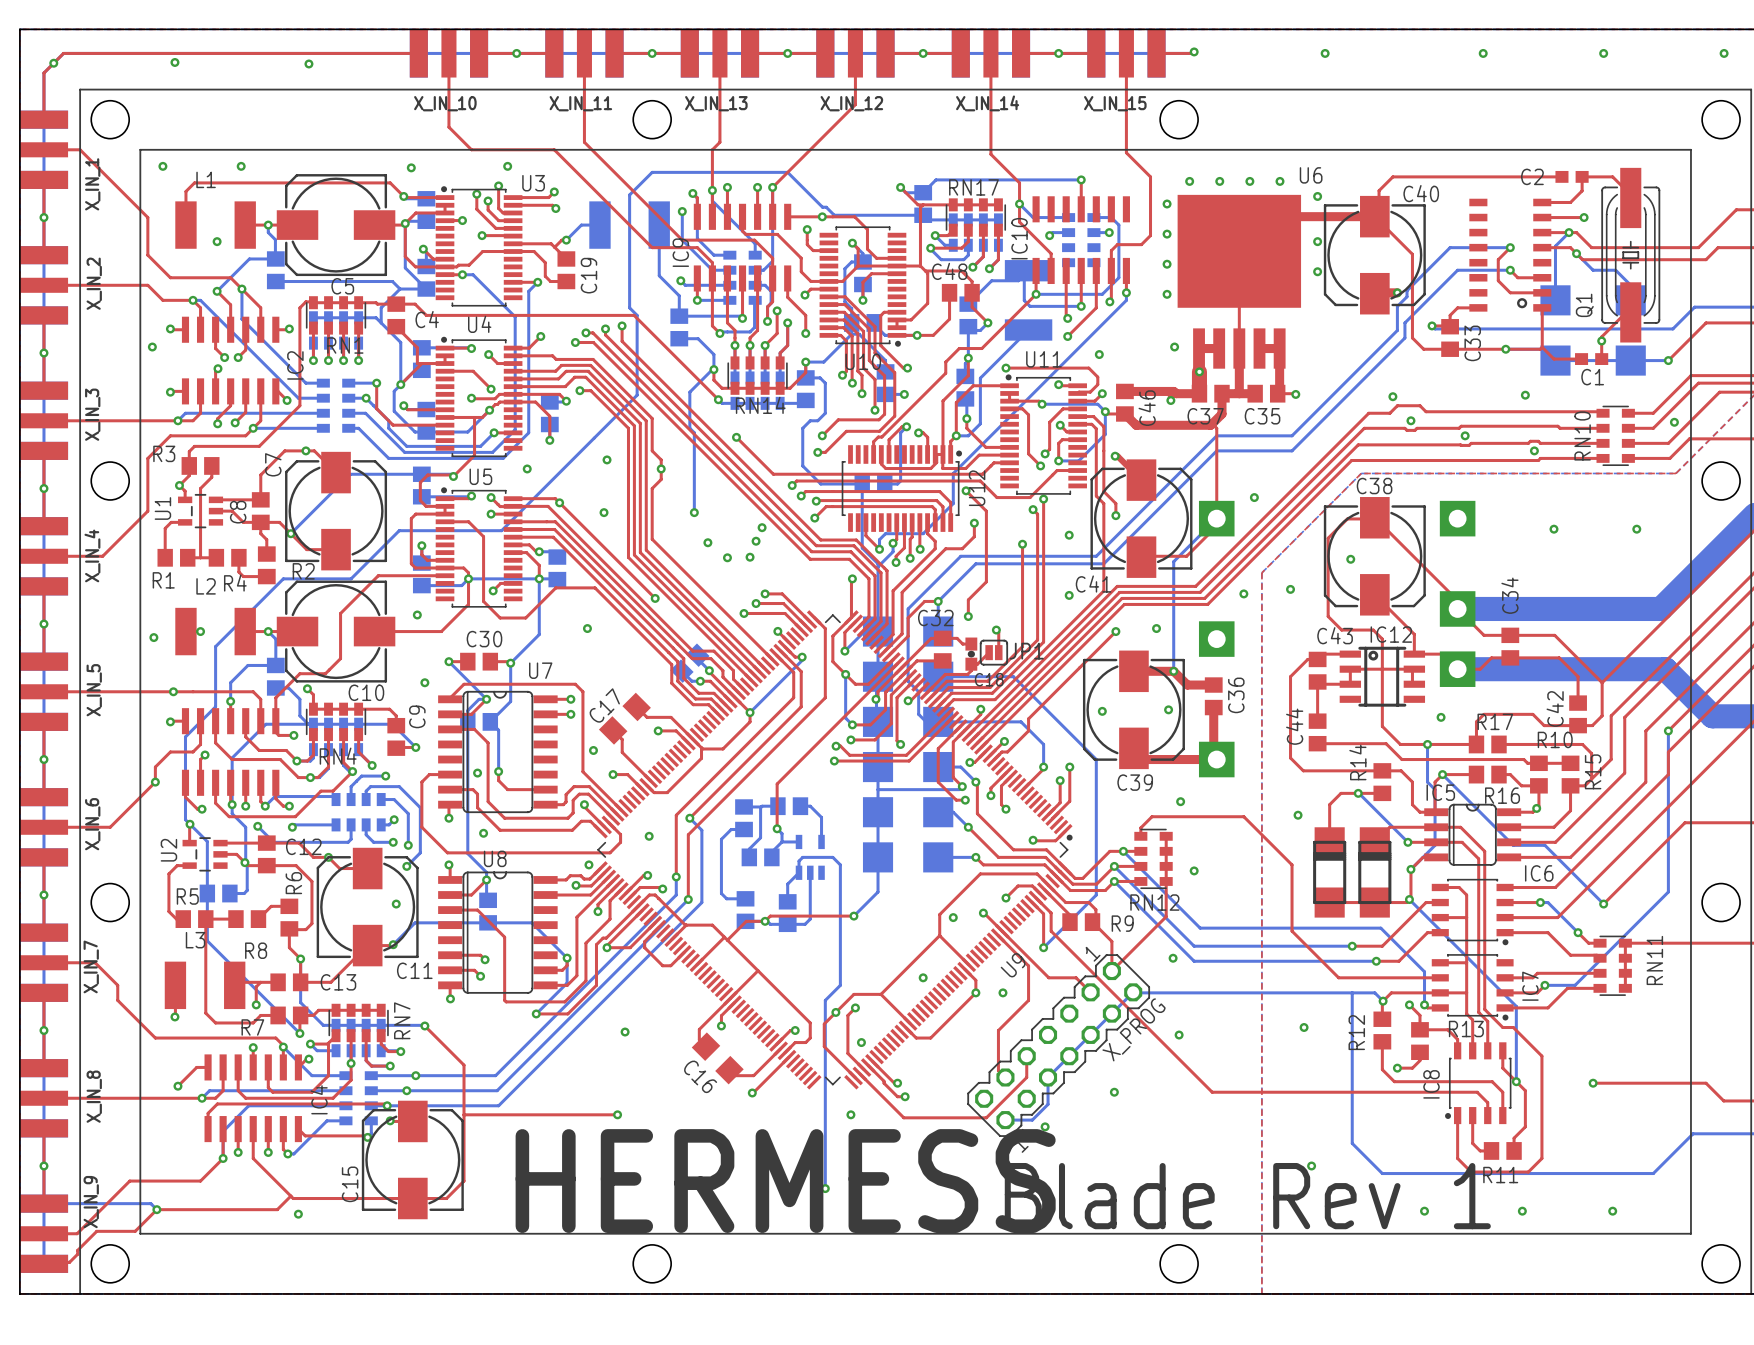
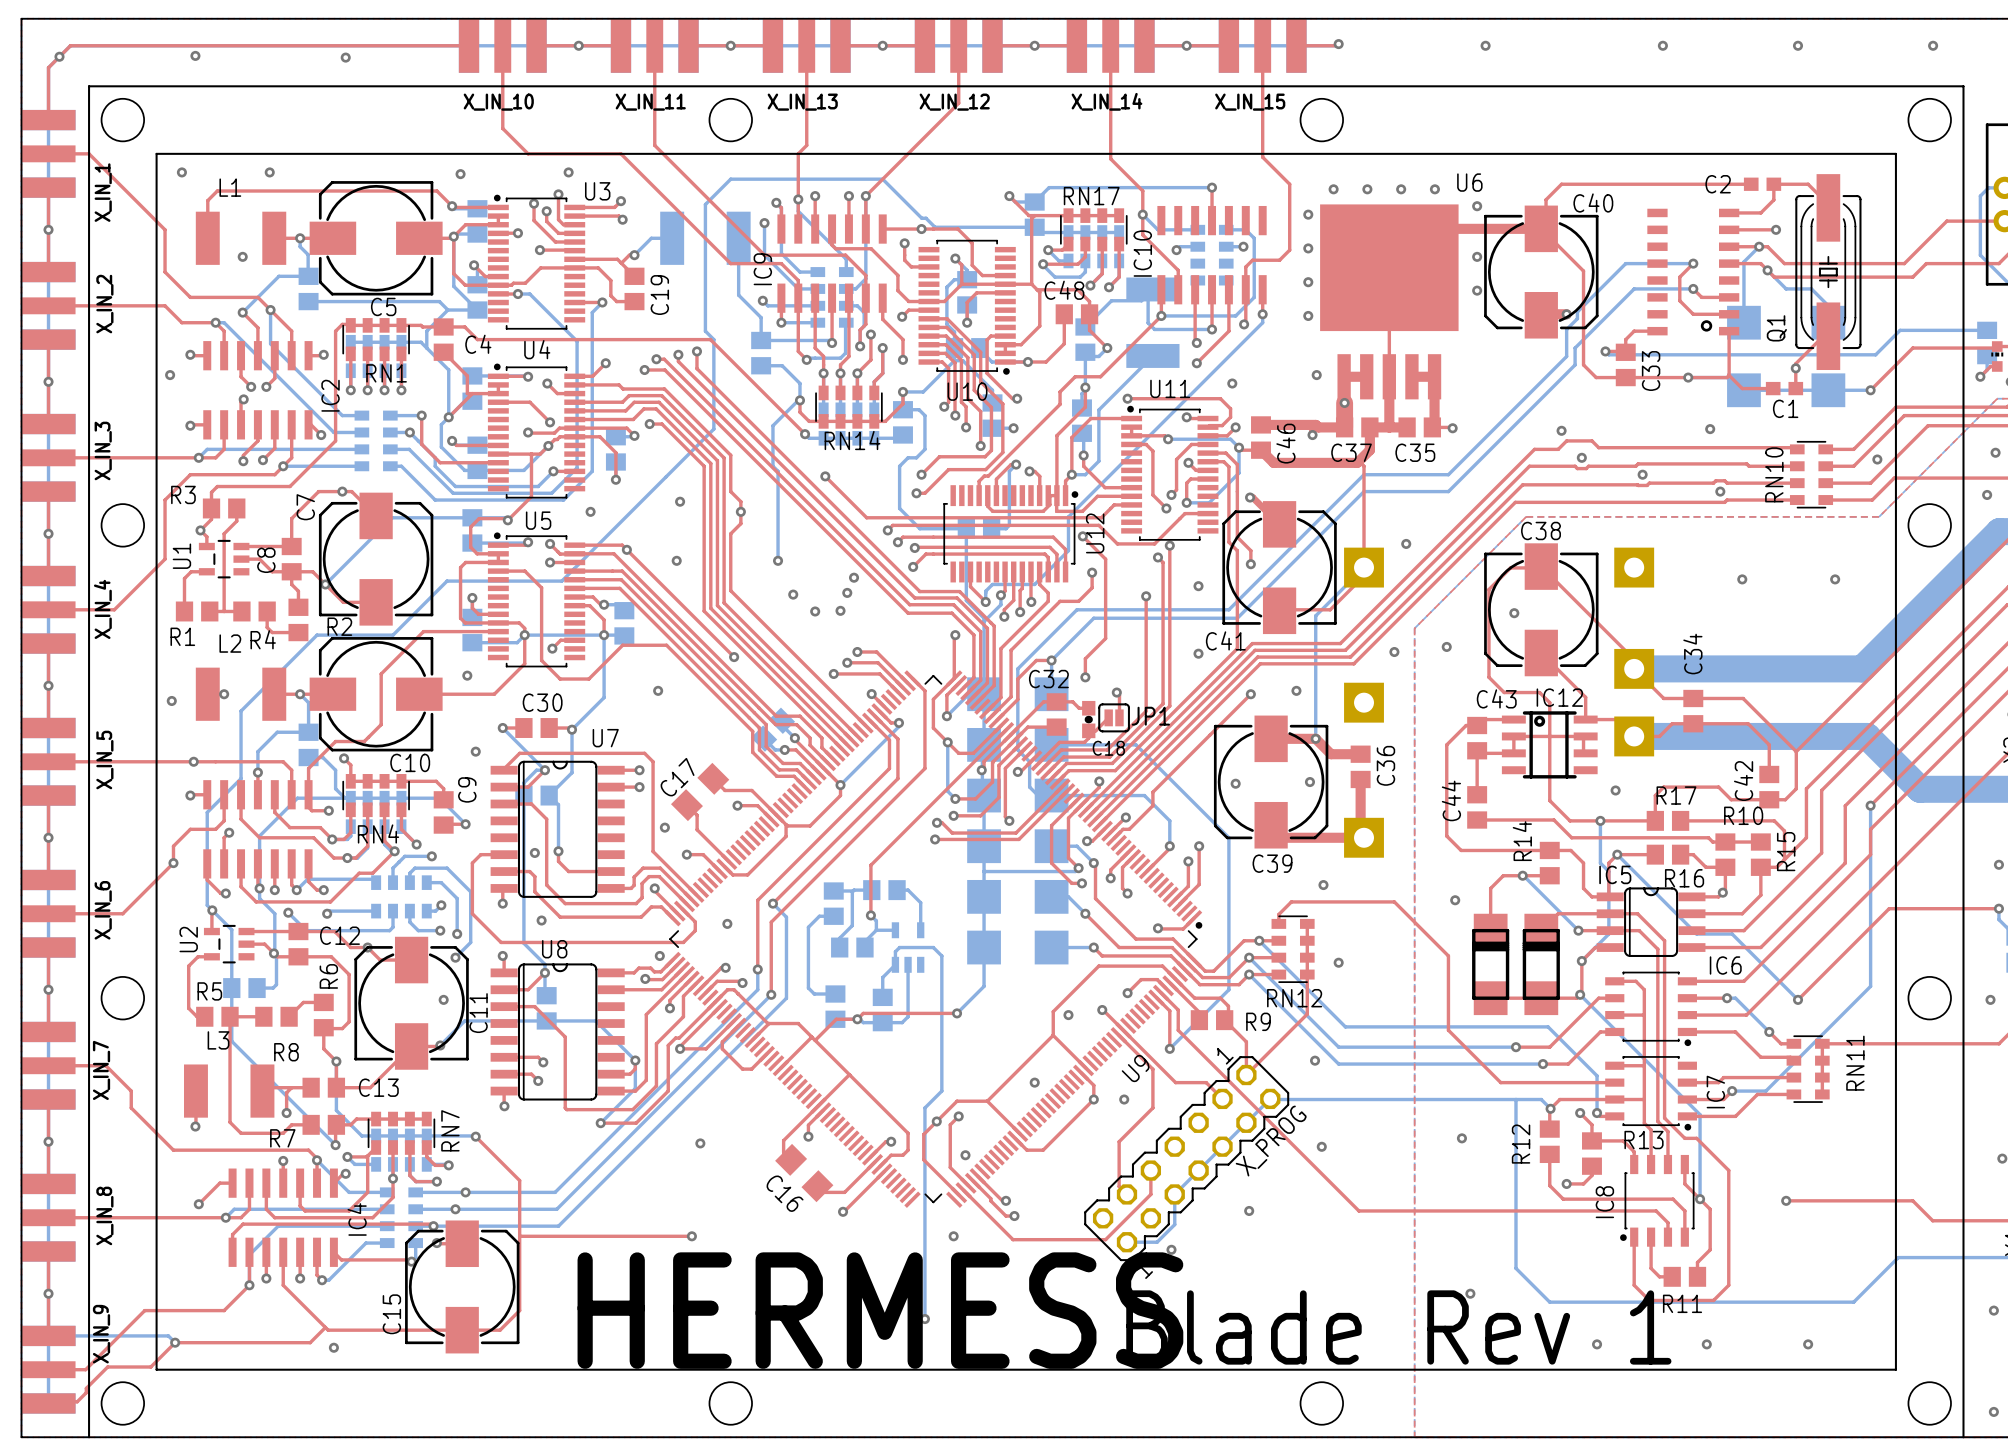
C11 name rotation: 0° (414, 970) -> 90° counterclockwise (478, 1013)
C11 name position: C11 (414, 970) -> C11 (478, 1013)

